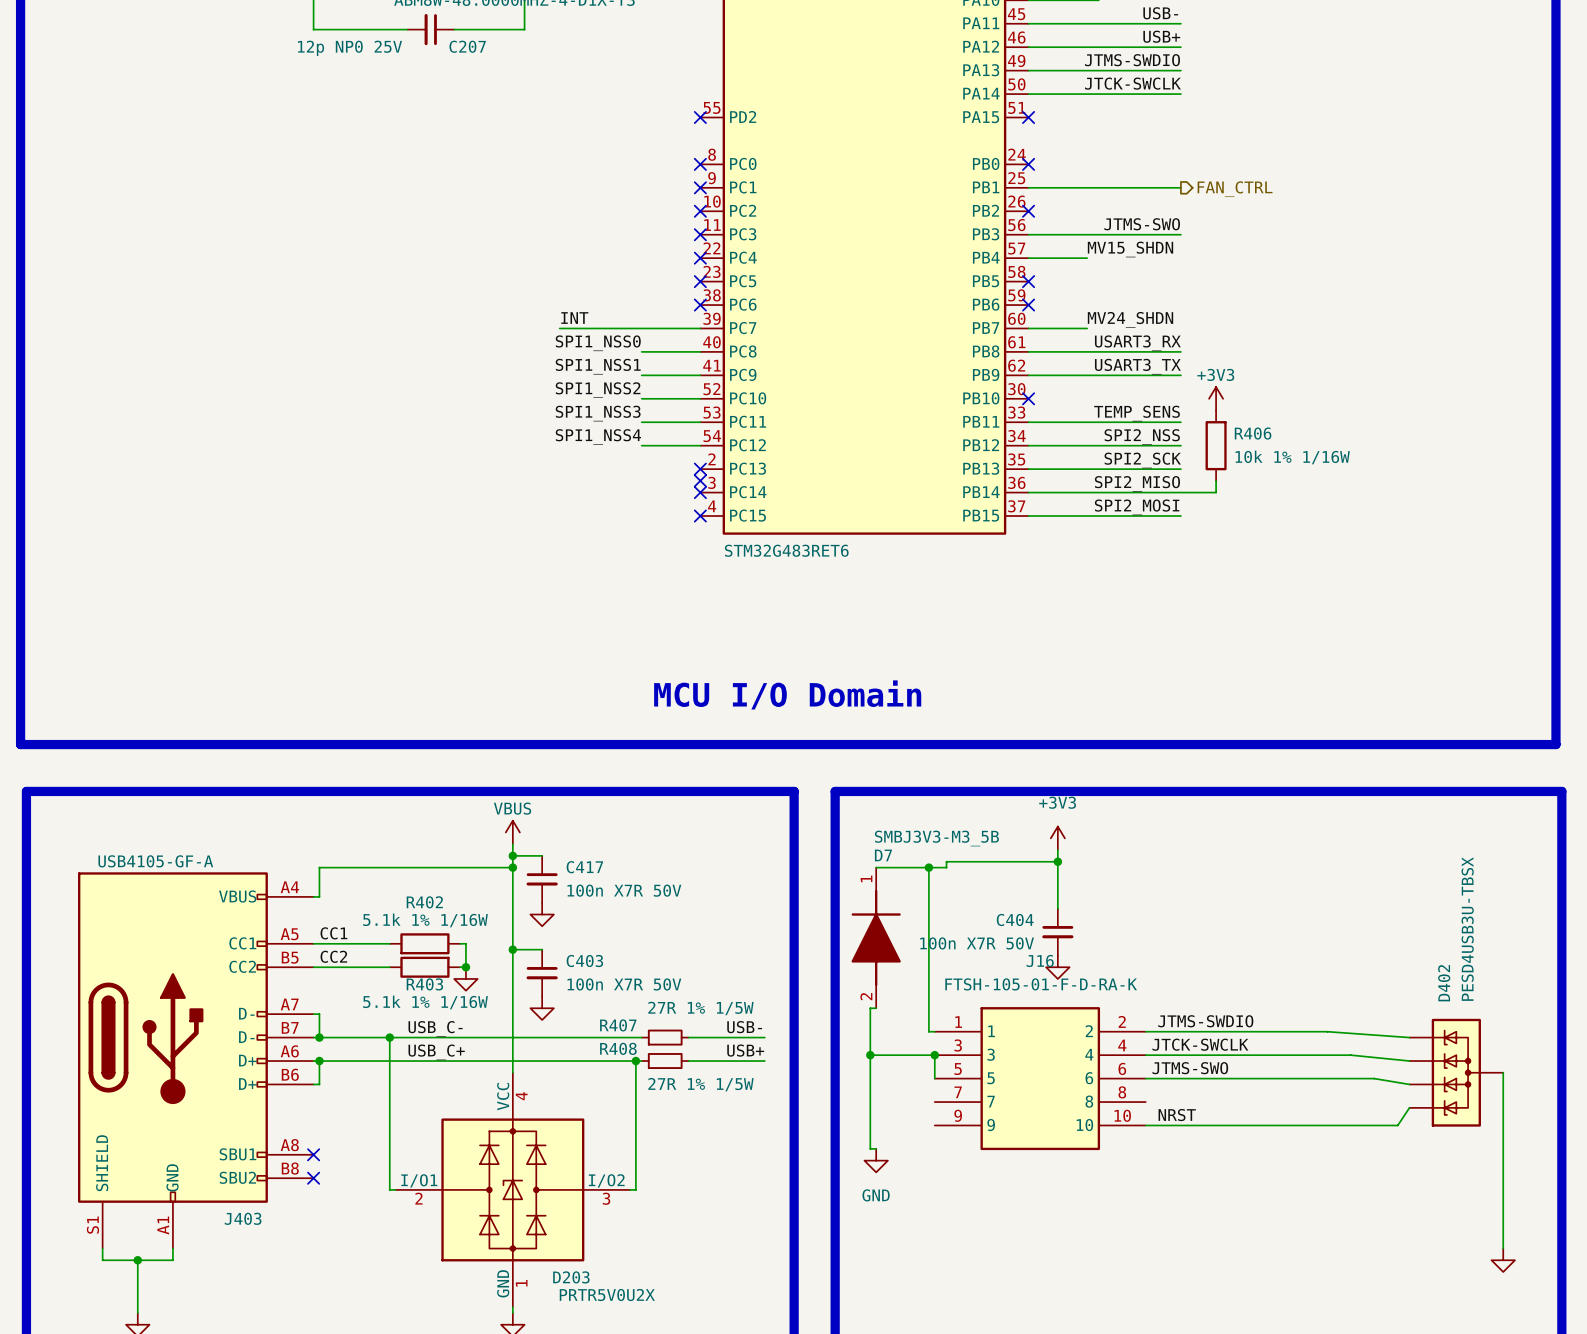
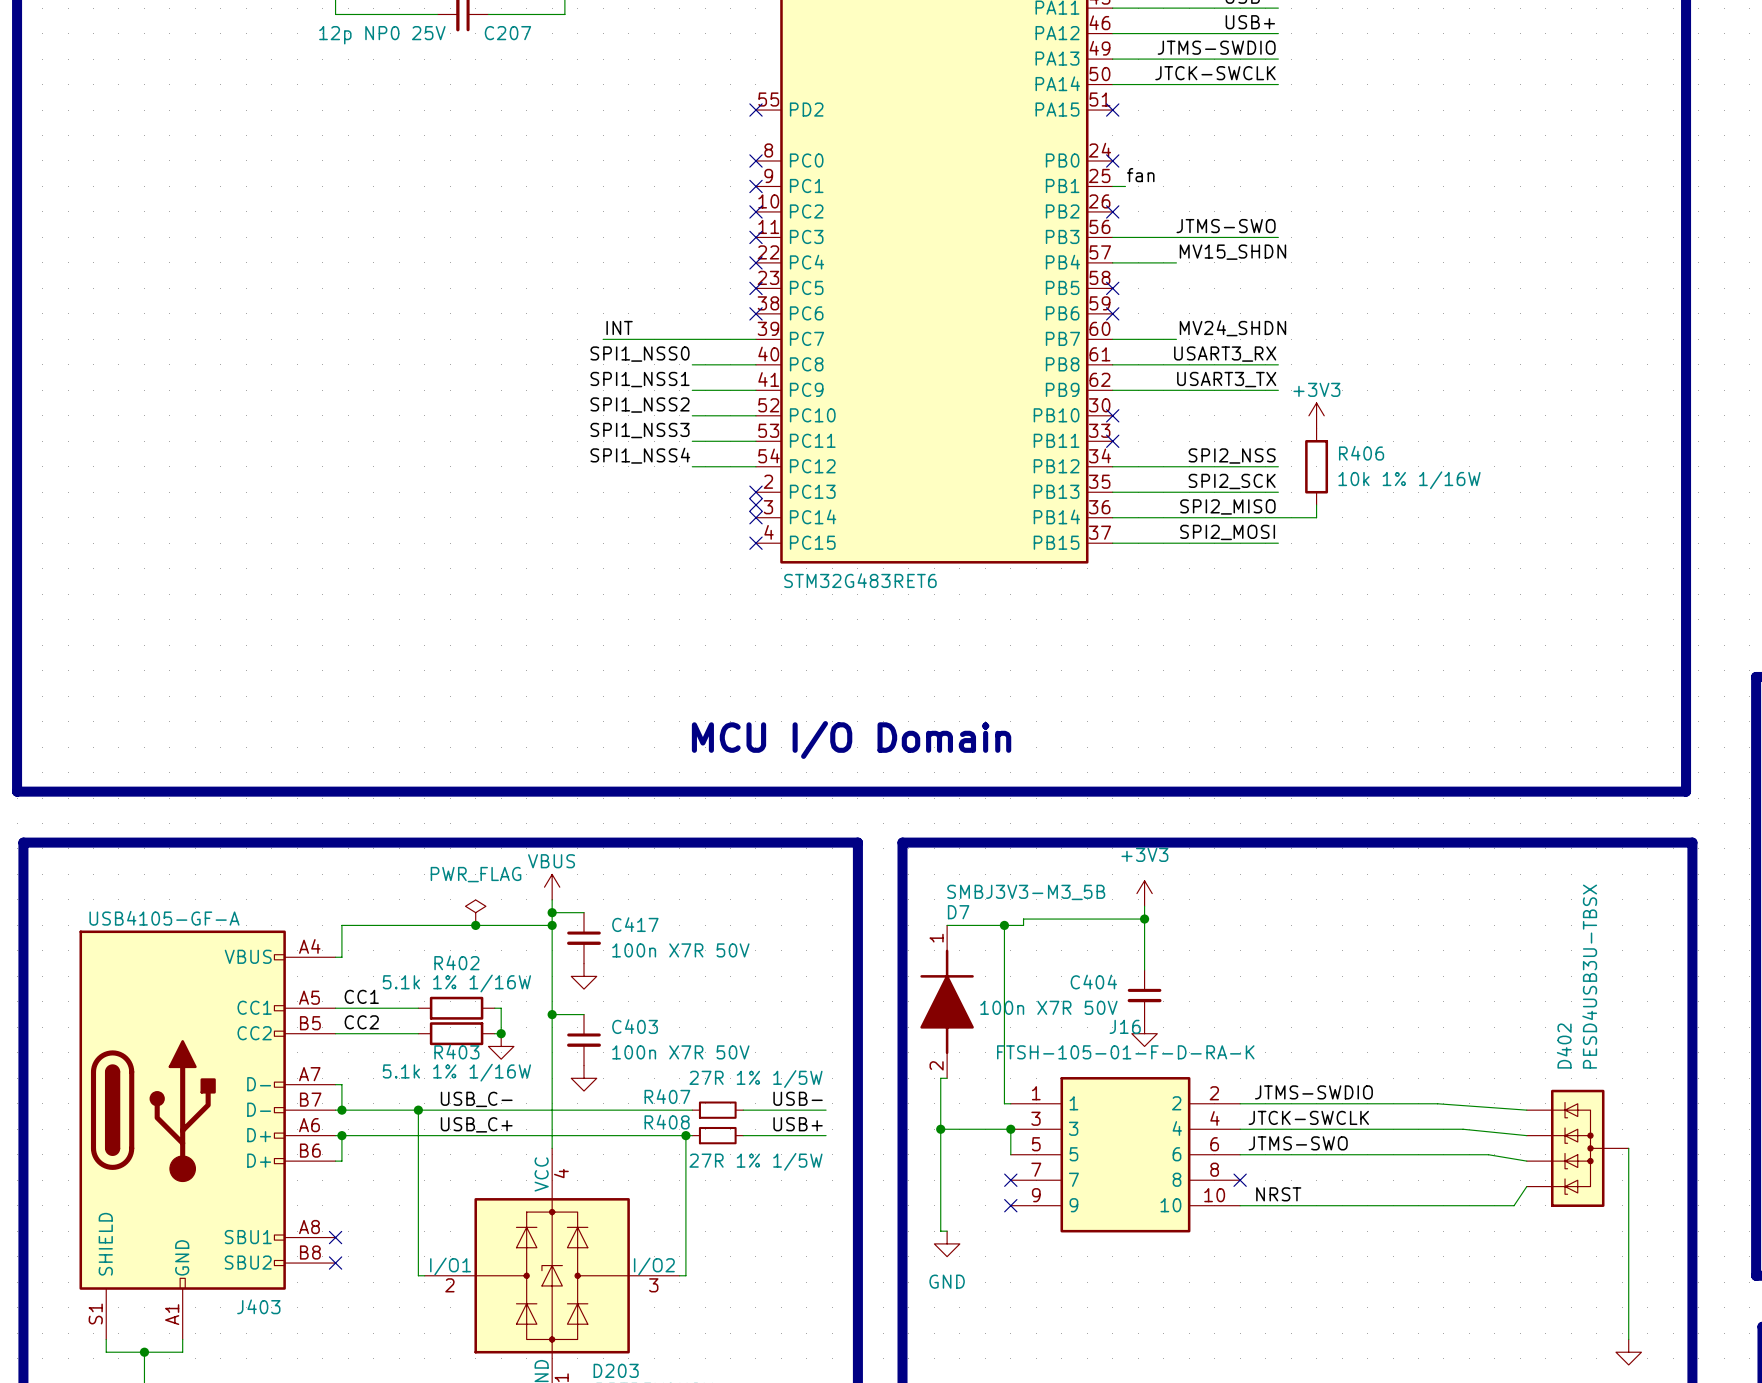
label: none -> fan (1140, 175)
wire: (1040, 187) (1180, 187) -> none
hierarchical label: FAN_CTRL (1235, 189) -> none
label: TEMP_SENS (1137, 413) -> none
wire: (1028, 422) (1180, 422) -> none
no-connect mark: none -> (1112, 441)
power symbol: none -> PWR_FLAG (475, 912)
junction: none -> (475, 925)
no-connect mark: none -> (1010, 1180)
no-connect mark: none -> (1240, 1180)
no-connect mark: none -> (1010, 1205)

